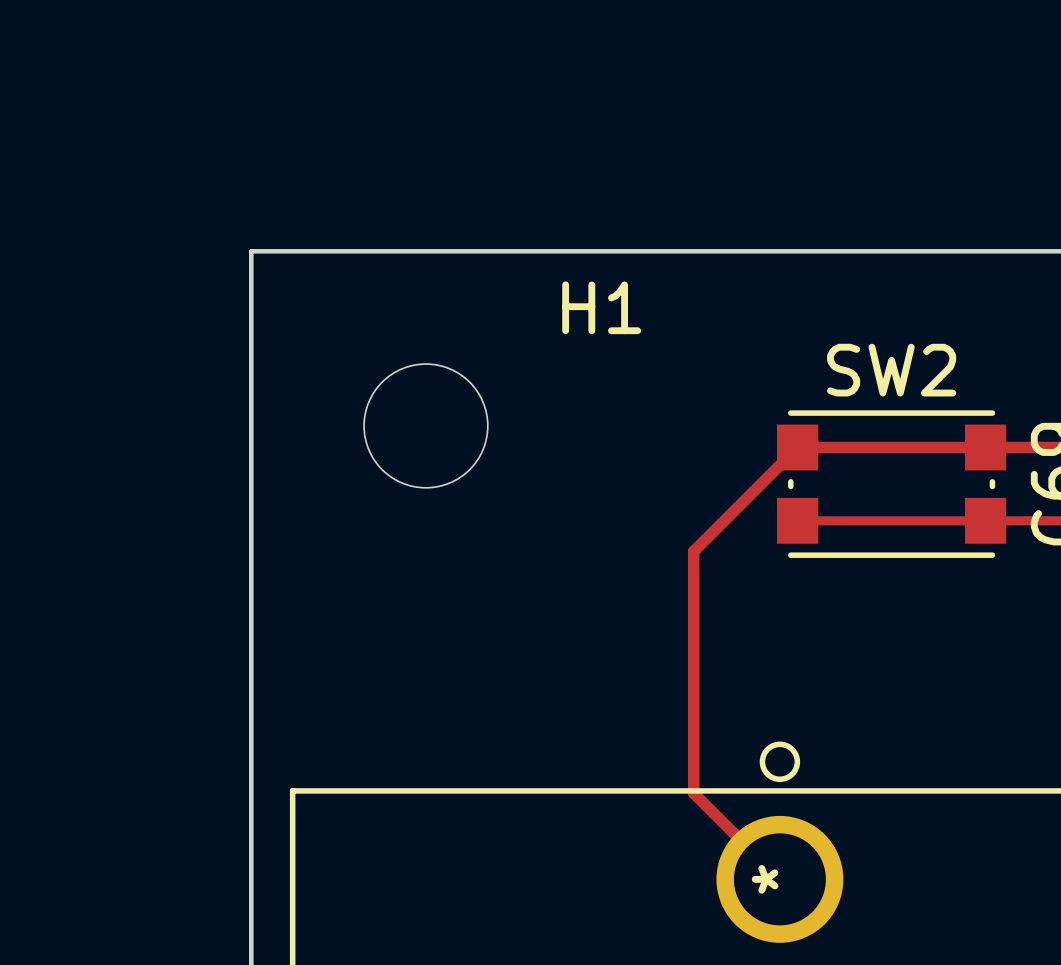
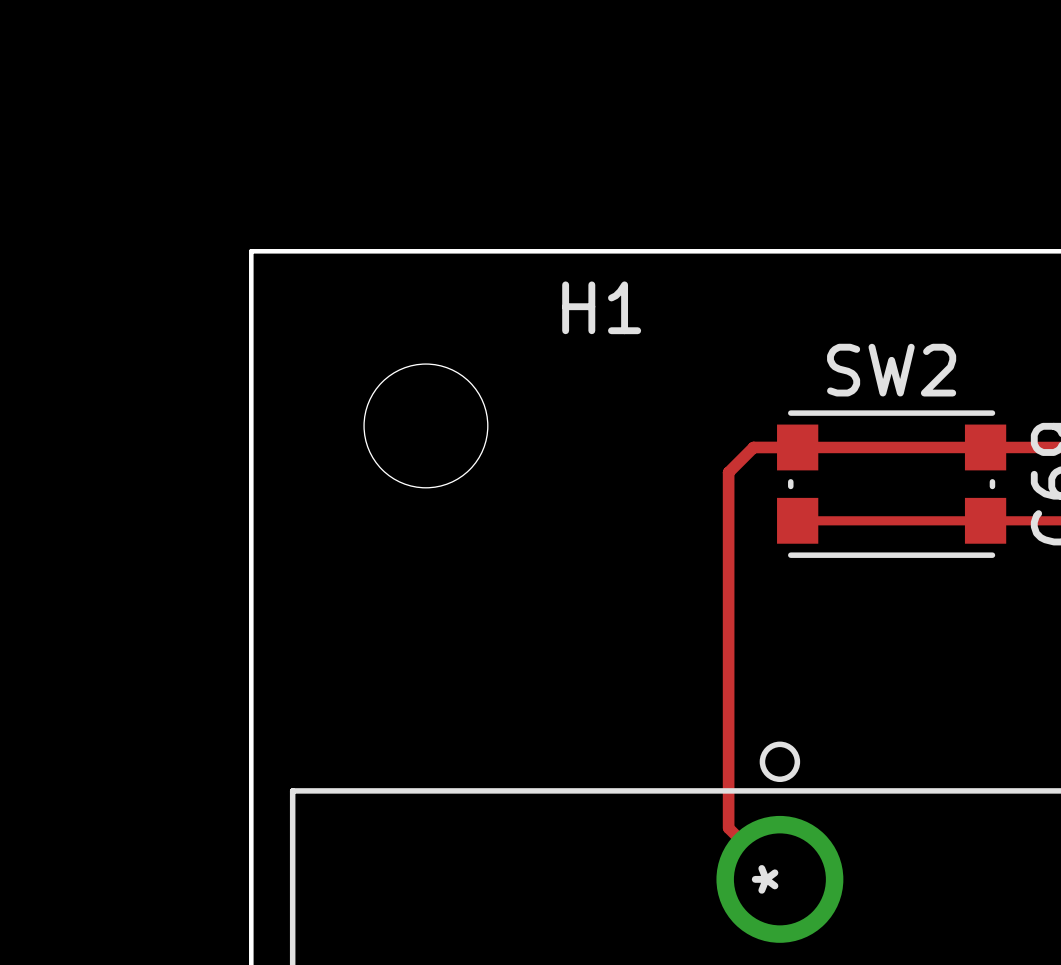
top track: (797, 447) (693, 551) (693, 793) (728, 828) -> (797, 447) (753, 447) (728, 472) (728, 828)

